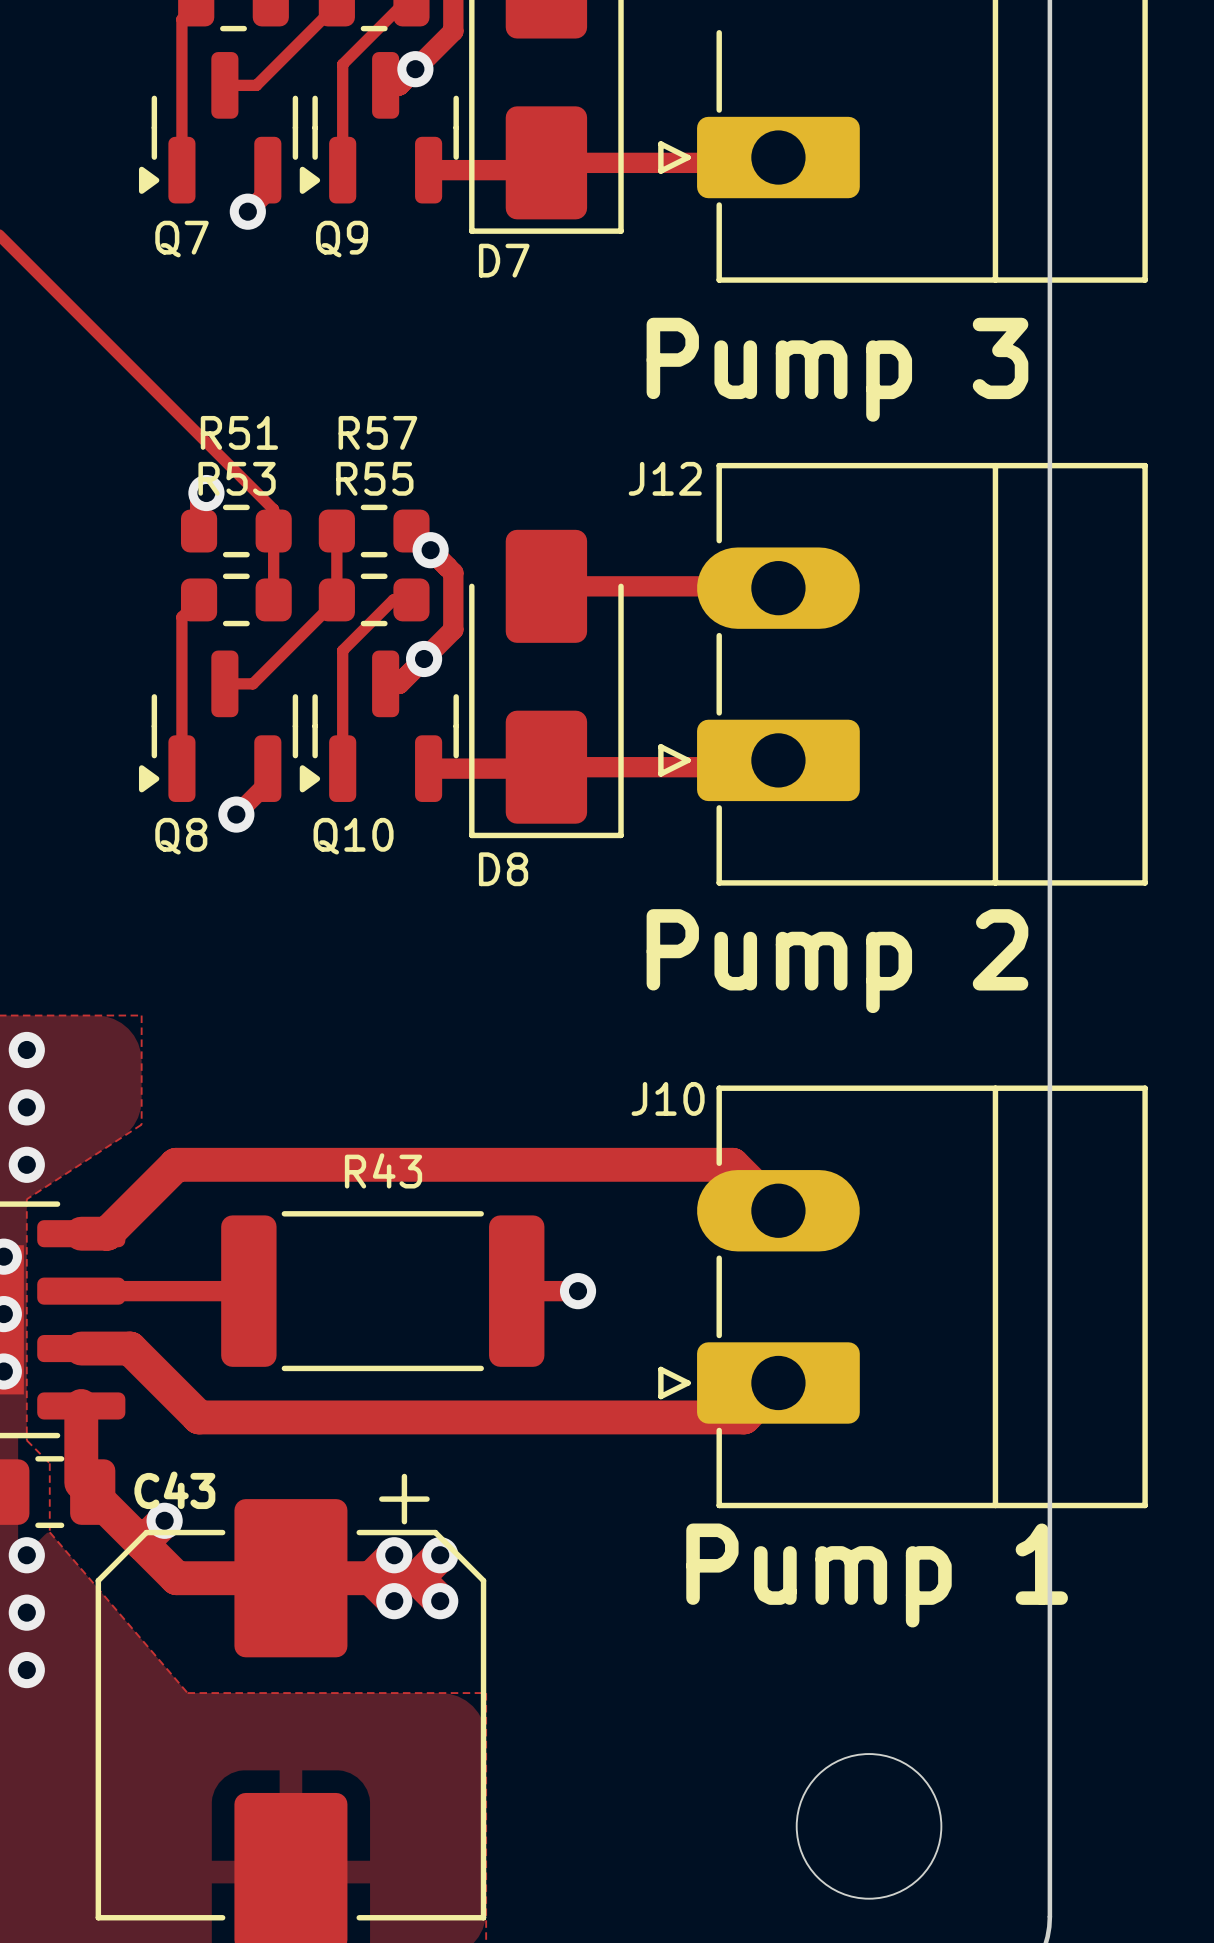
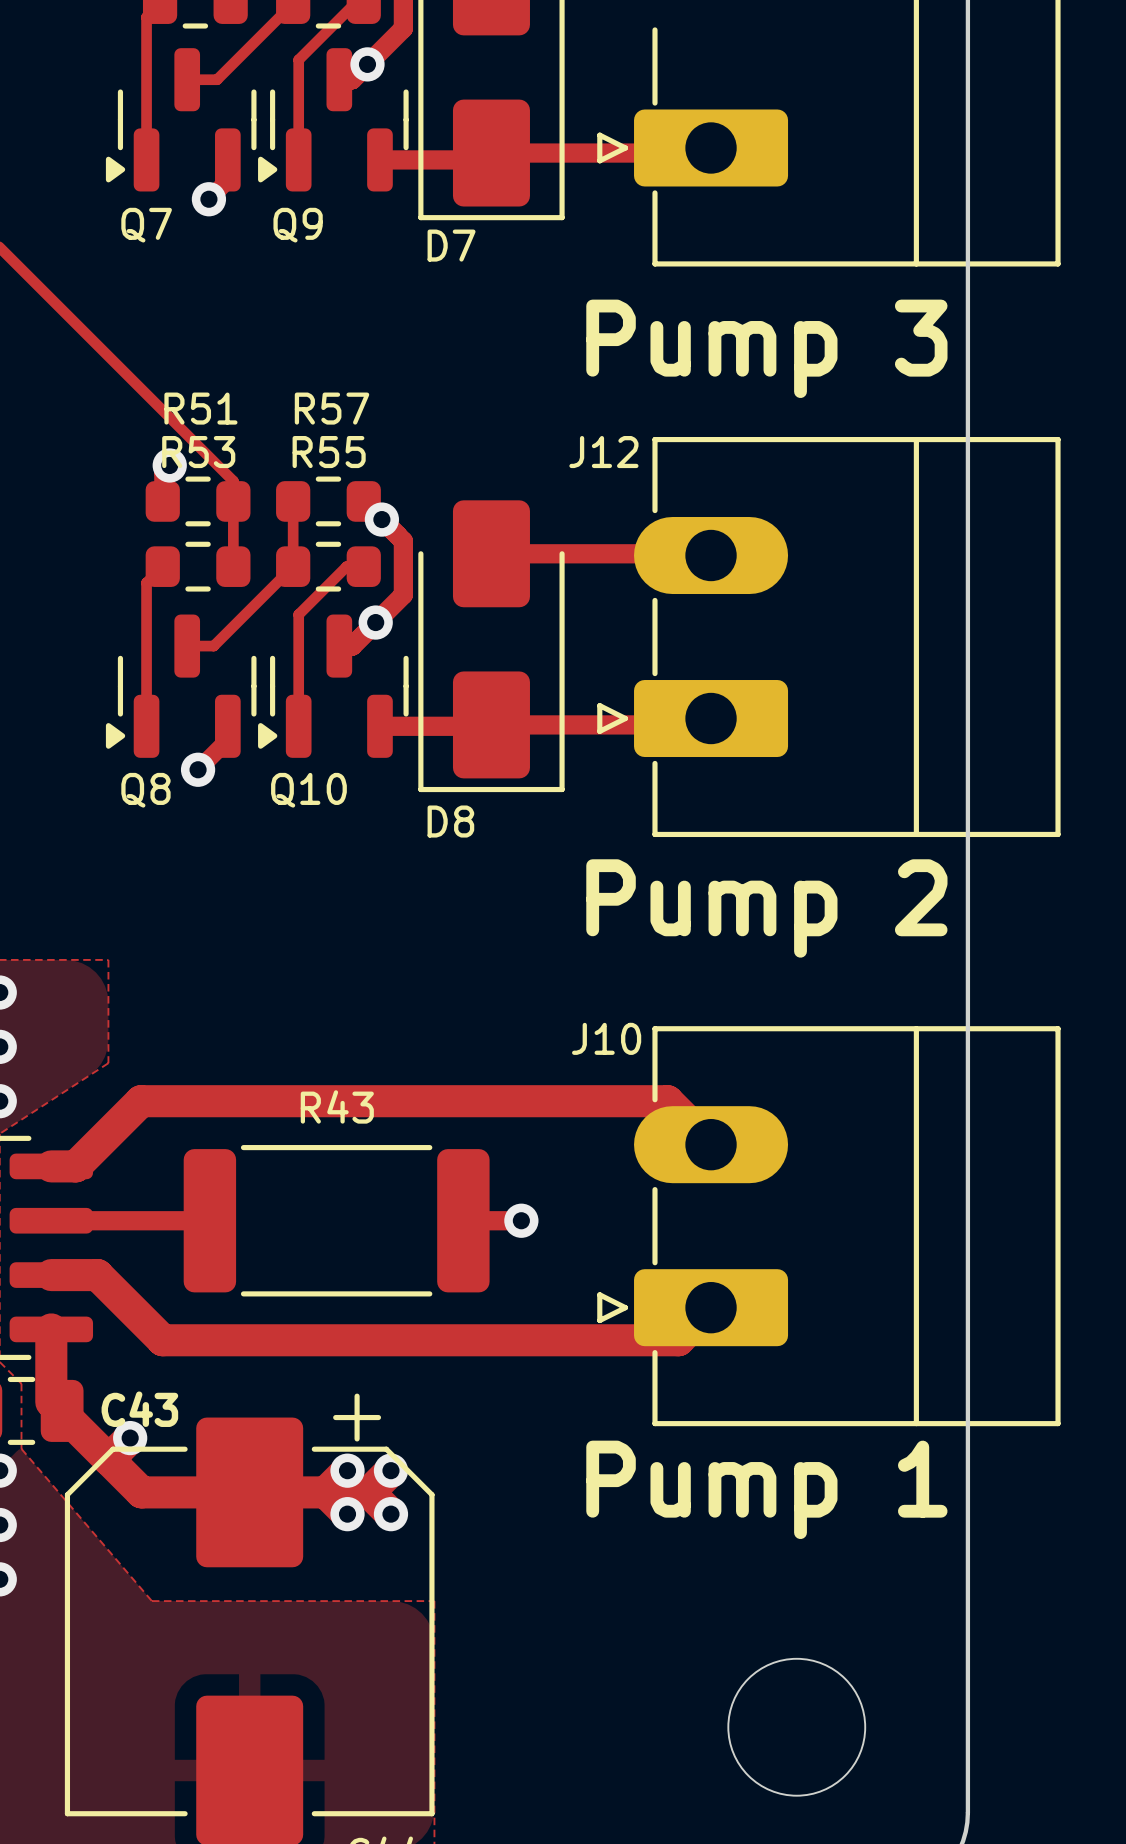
J10 value position: Pump 1 (877, 1575) -> Pump 1 (766, 1489)

